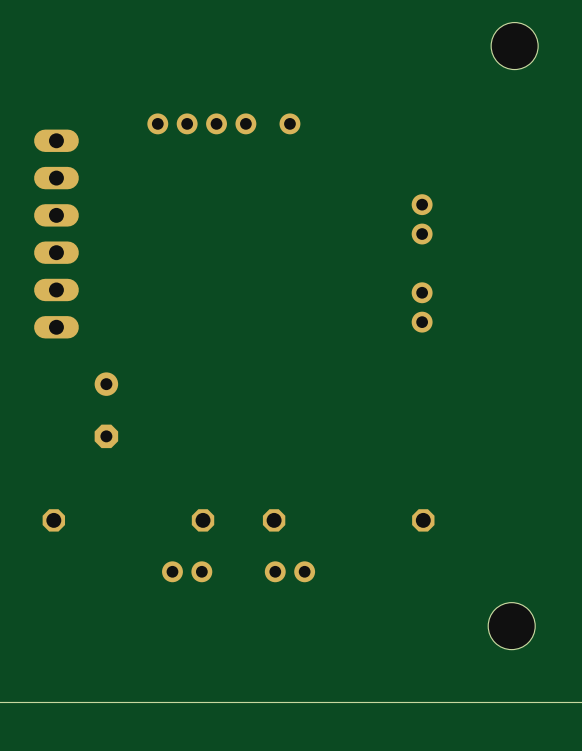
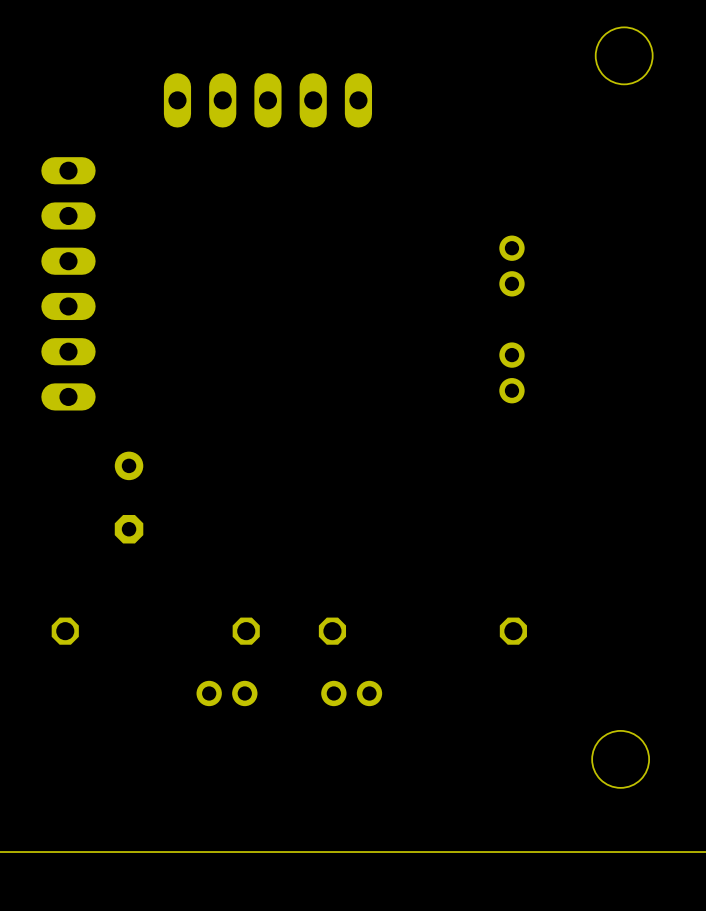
part: none -> (267, 100)
part: (201, 123) -> none
part: (289, 123) -> none

